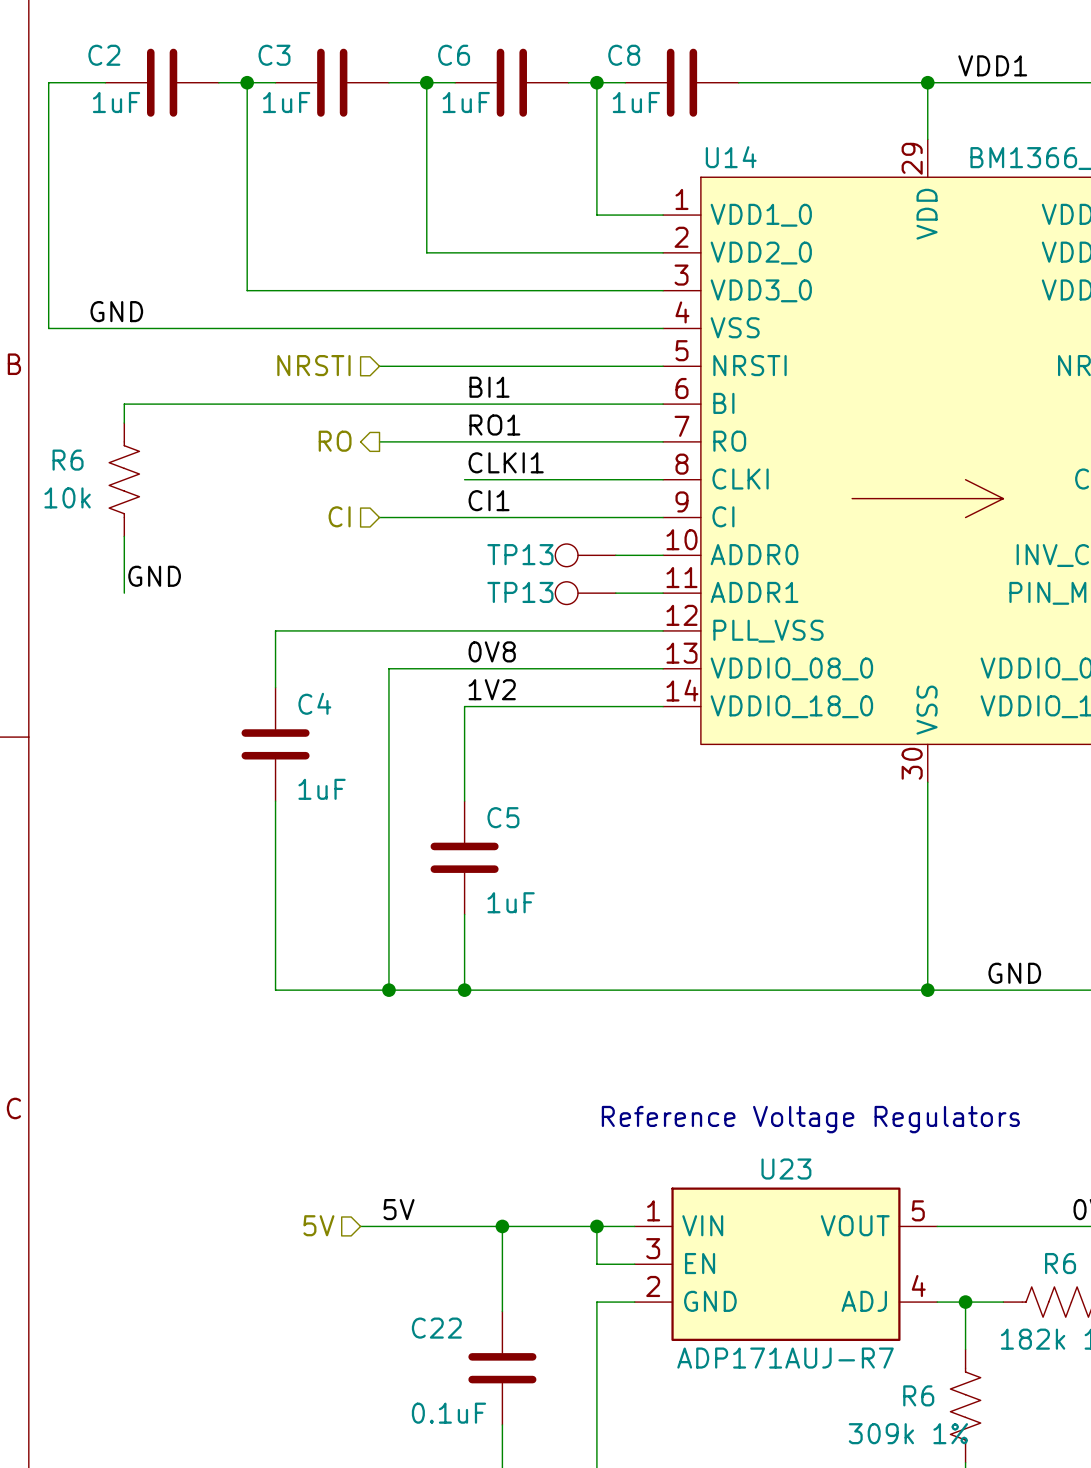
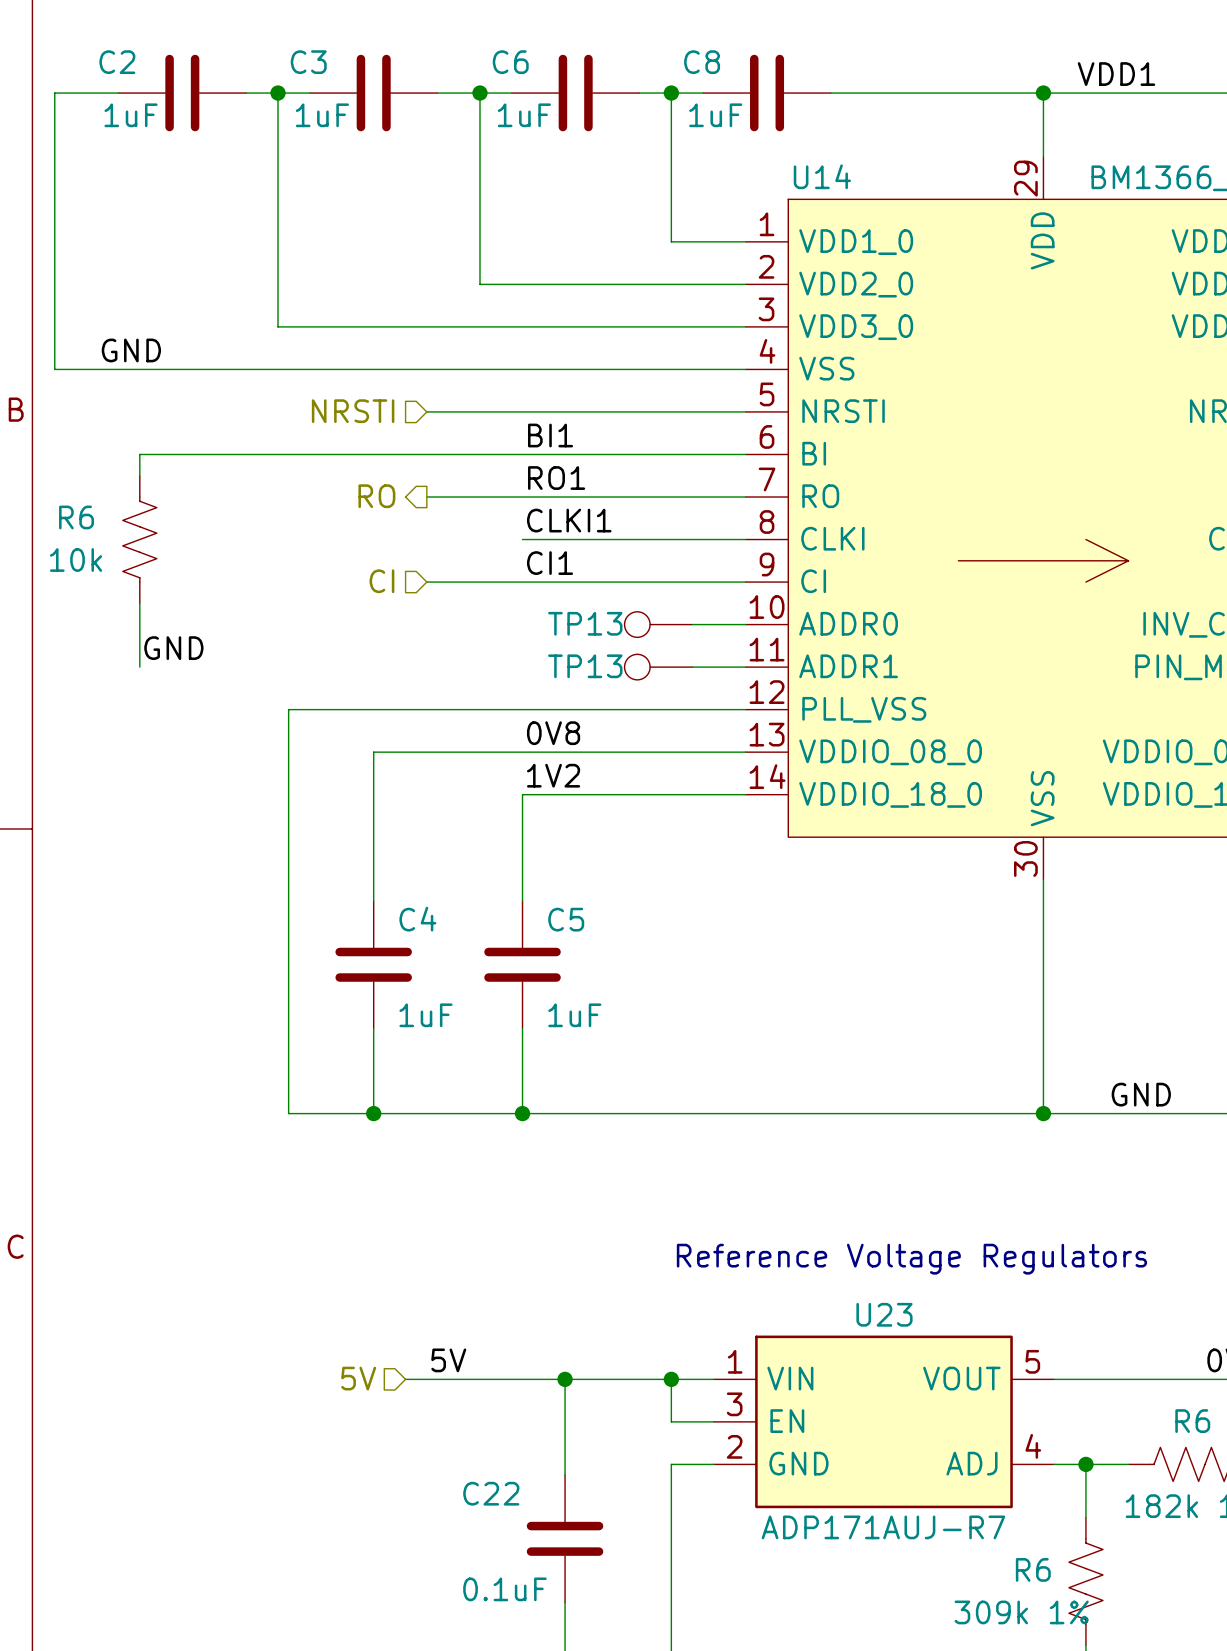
wire: (275, 630) (275, 687) -> none
wire: (388, 668) (388, 990) -> (437, 752) (373, 752) (373, 900)
C4 position: (275, 744) -> (373, 964)
wire: (275, 801) (275, 990) -> (309, 709) (288, 709) (288, 1113) (309, 1113)
wire: none -> (373, 1028) (373, 1113)
junction position: (388, 990) -> (373, 1113)

